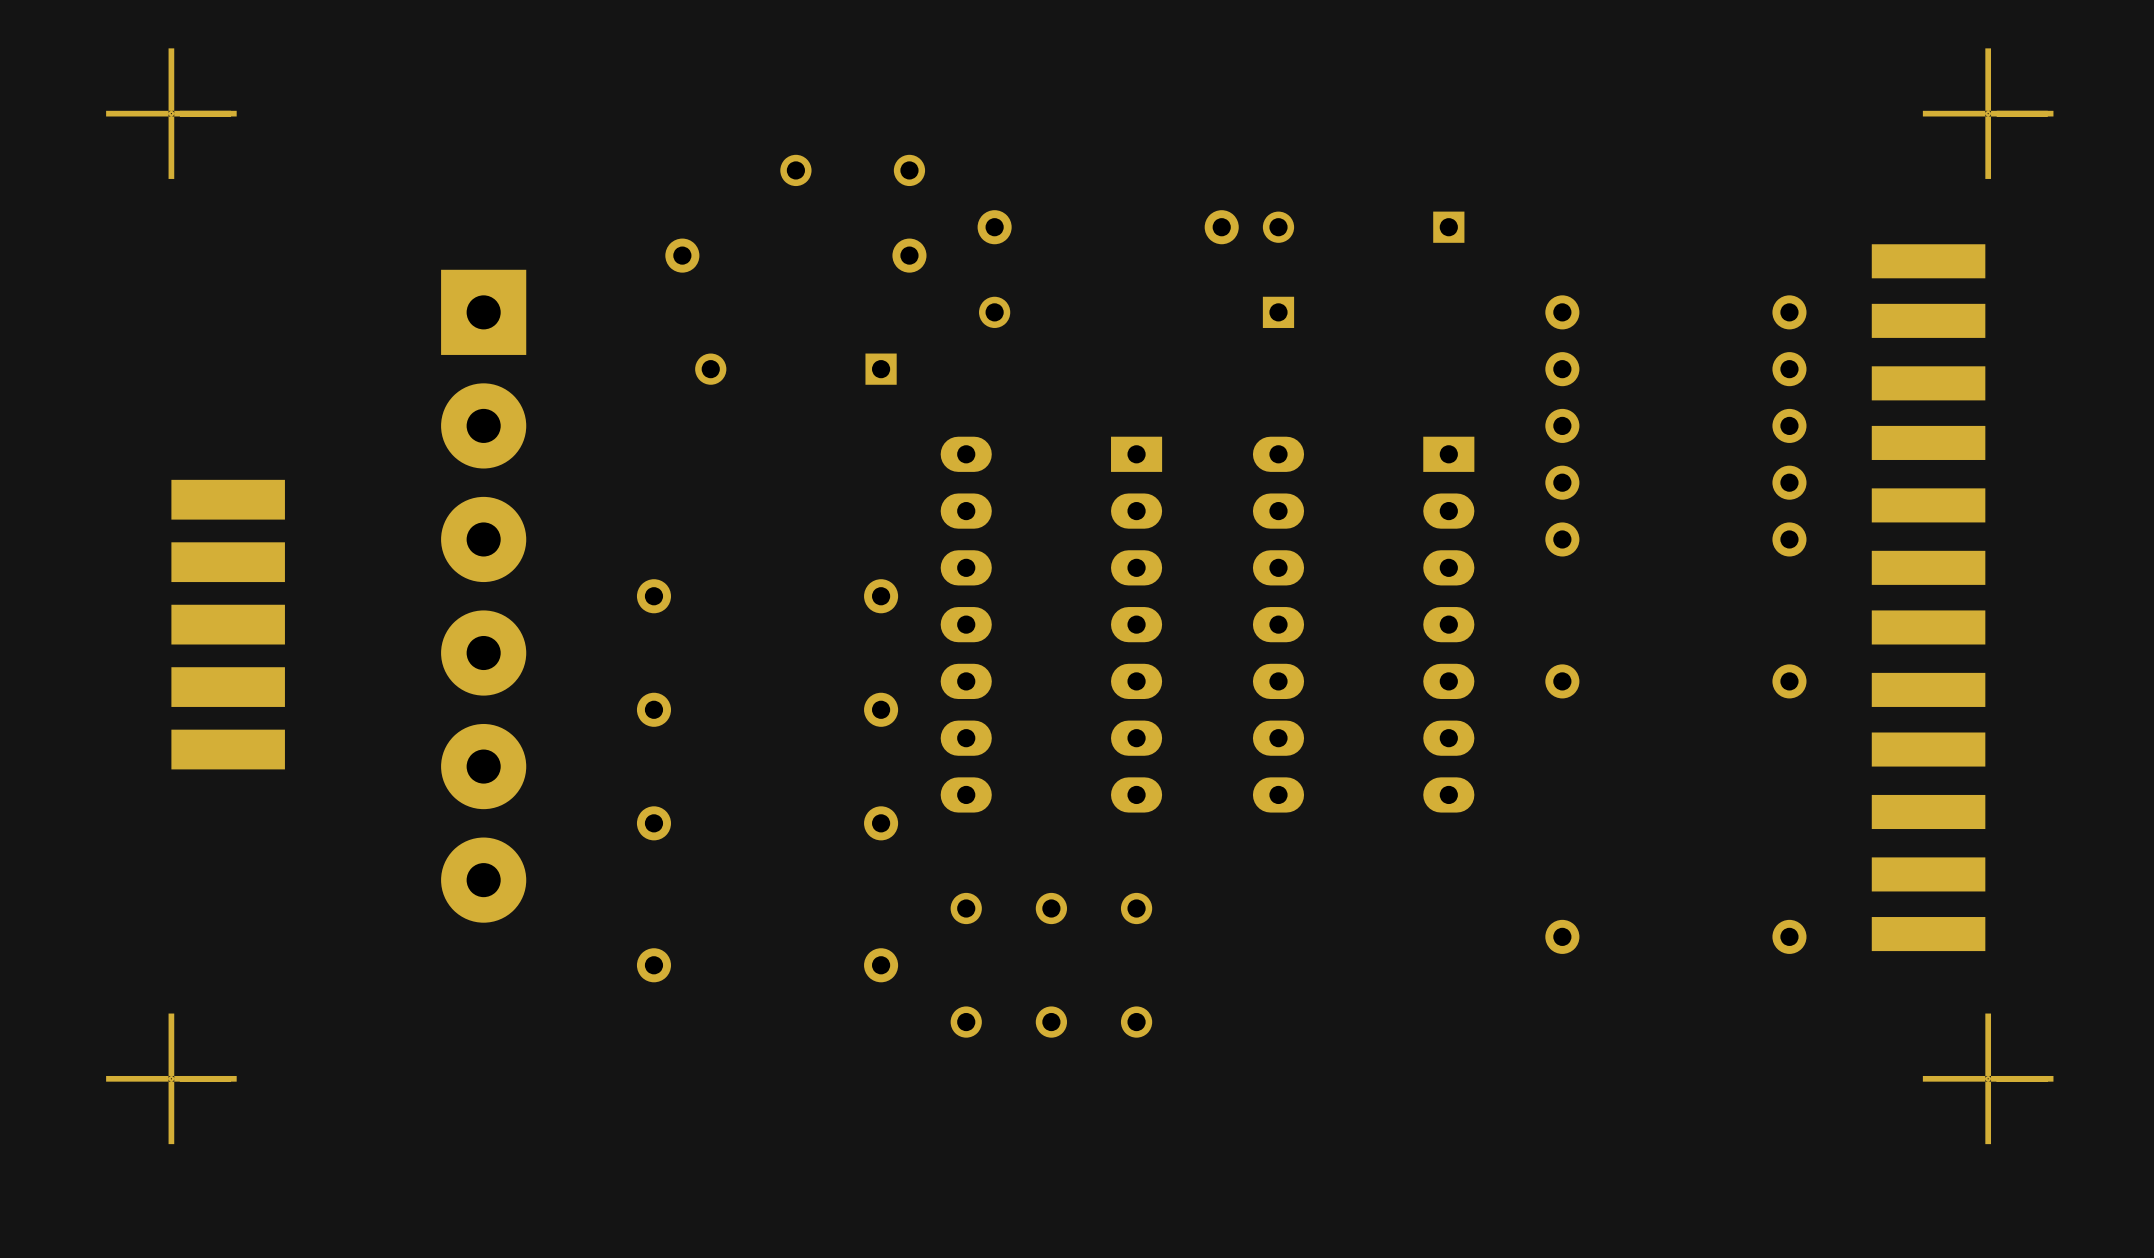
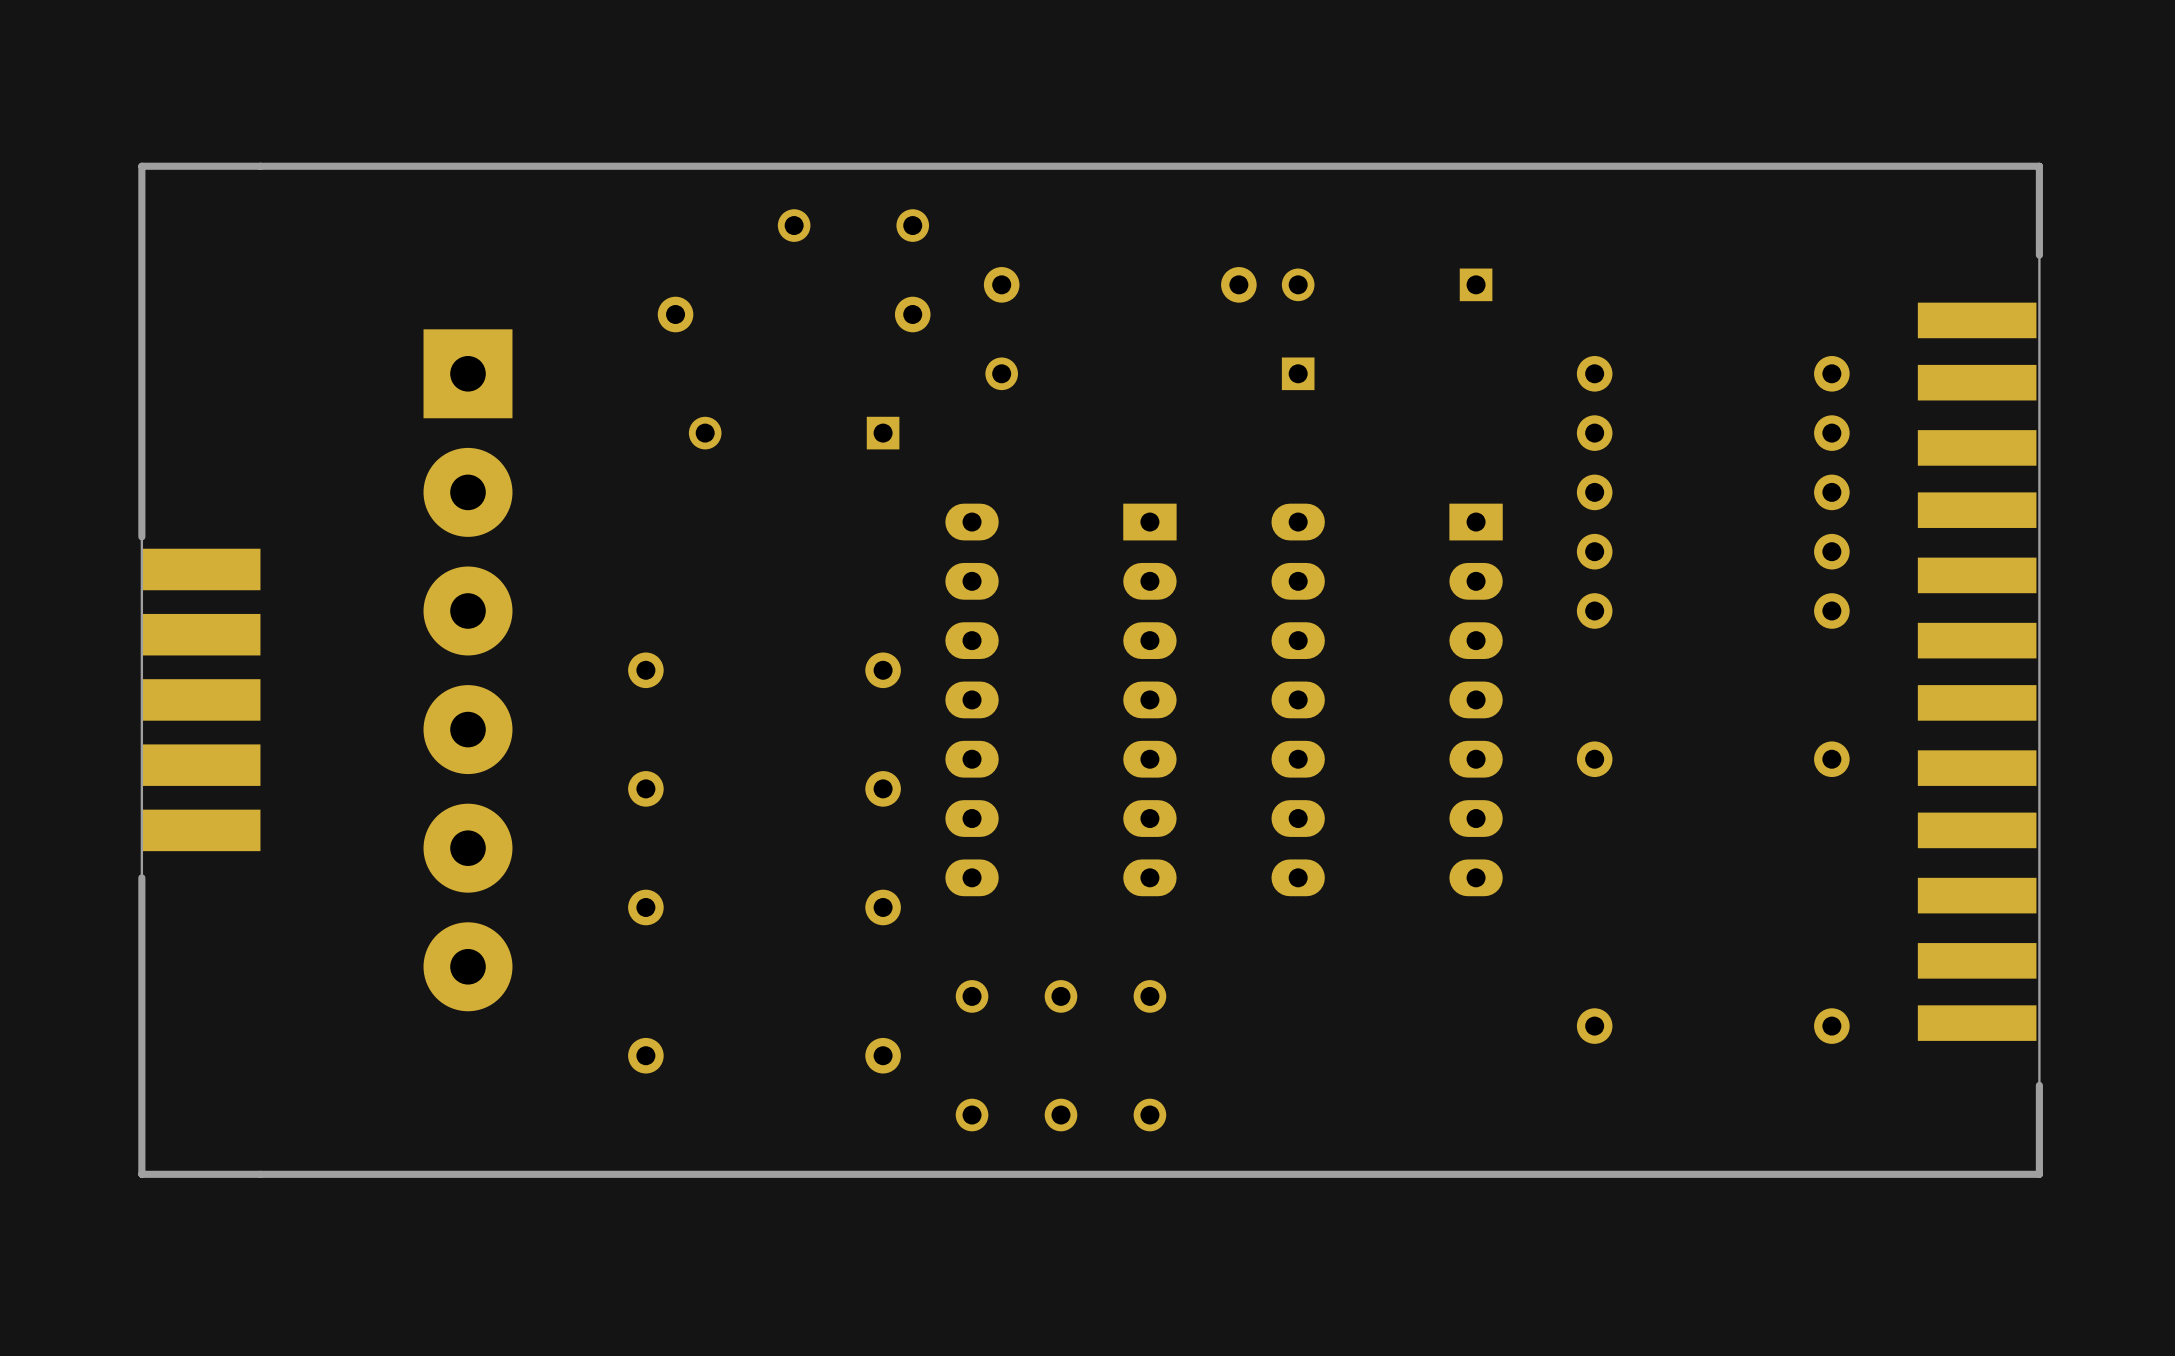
part: (171, 113) -> none
board edge: none -> (2039, 166) (141, 166) (141, 1174) (2039, 1174) (2039, 166)
part: (1988, 113) -> none
part: (171, 1078) -> none
part: (1988, 1078) -> none

